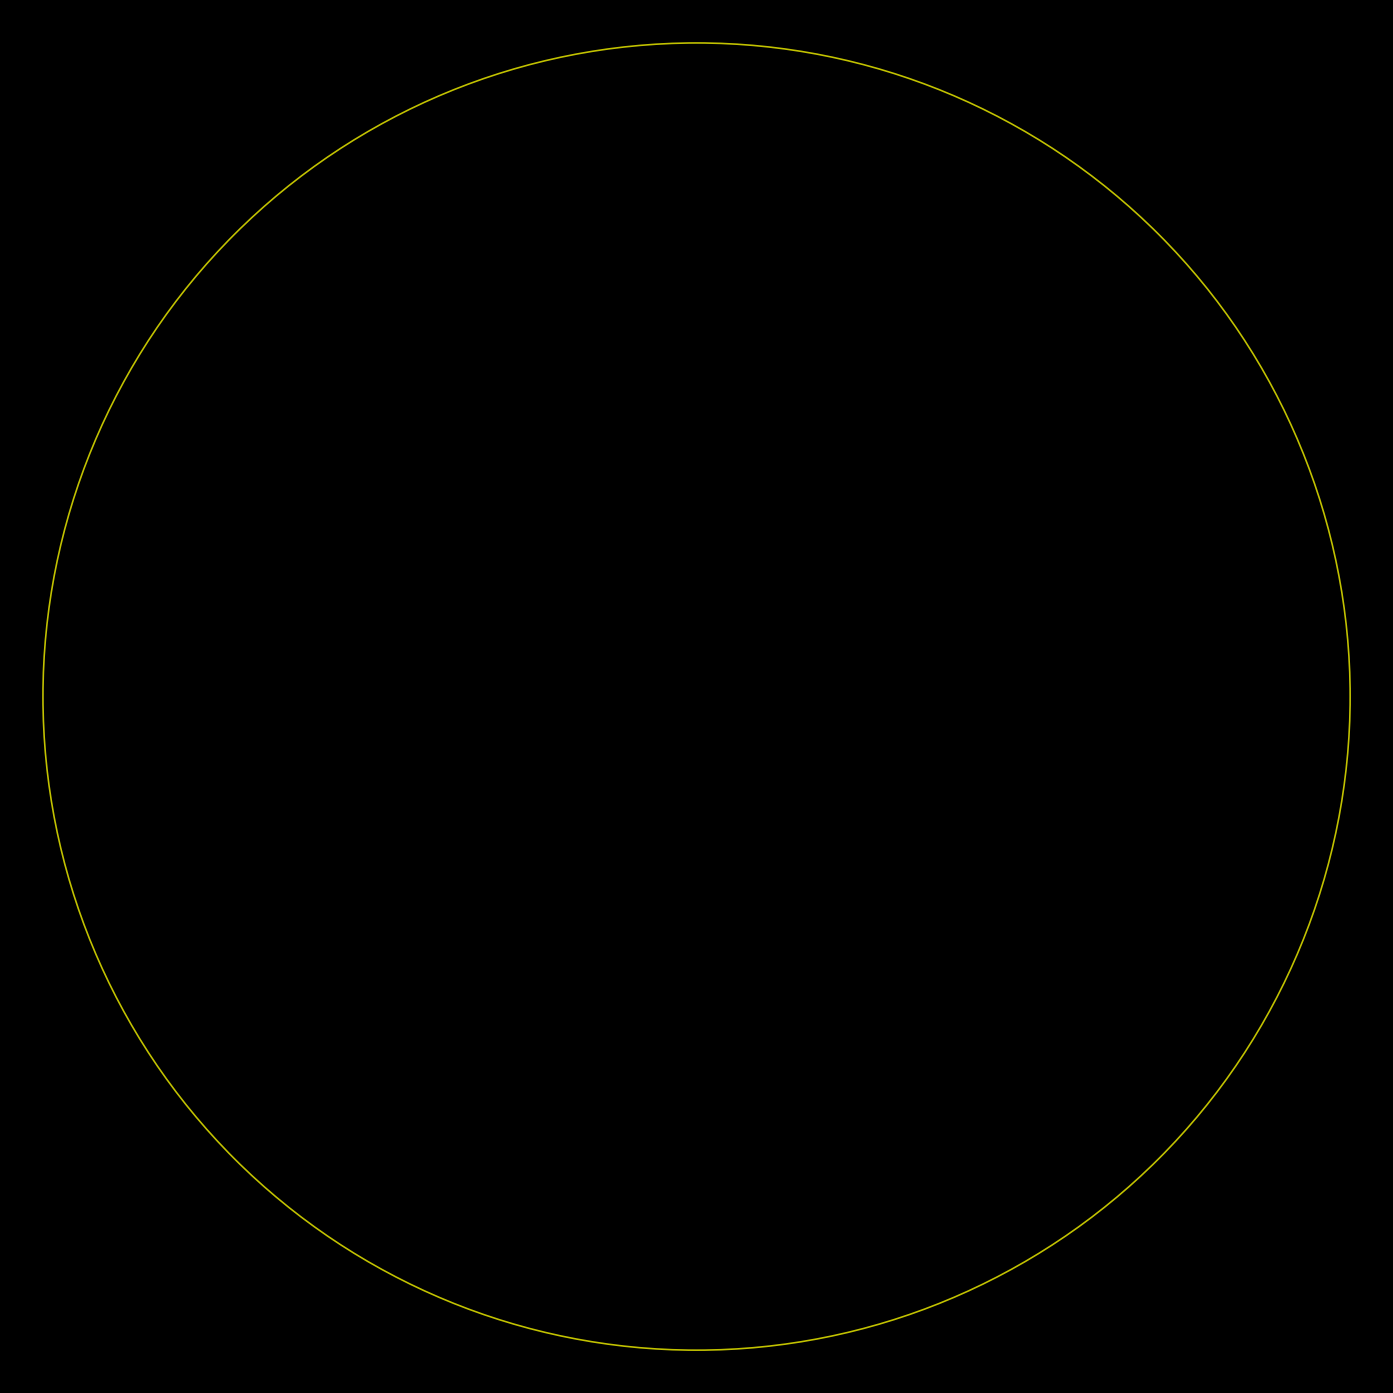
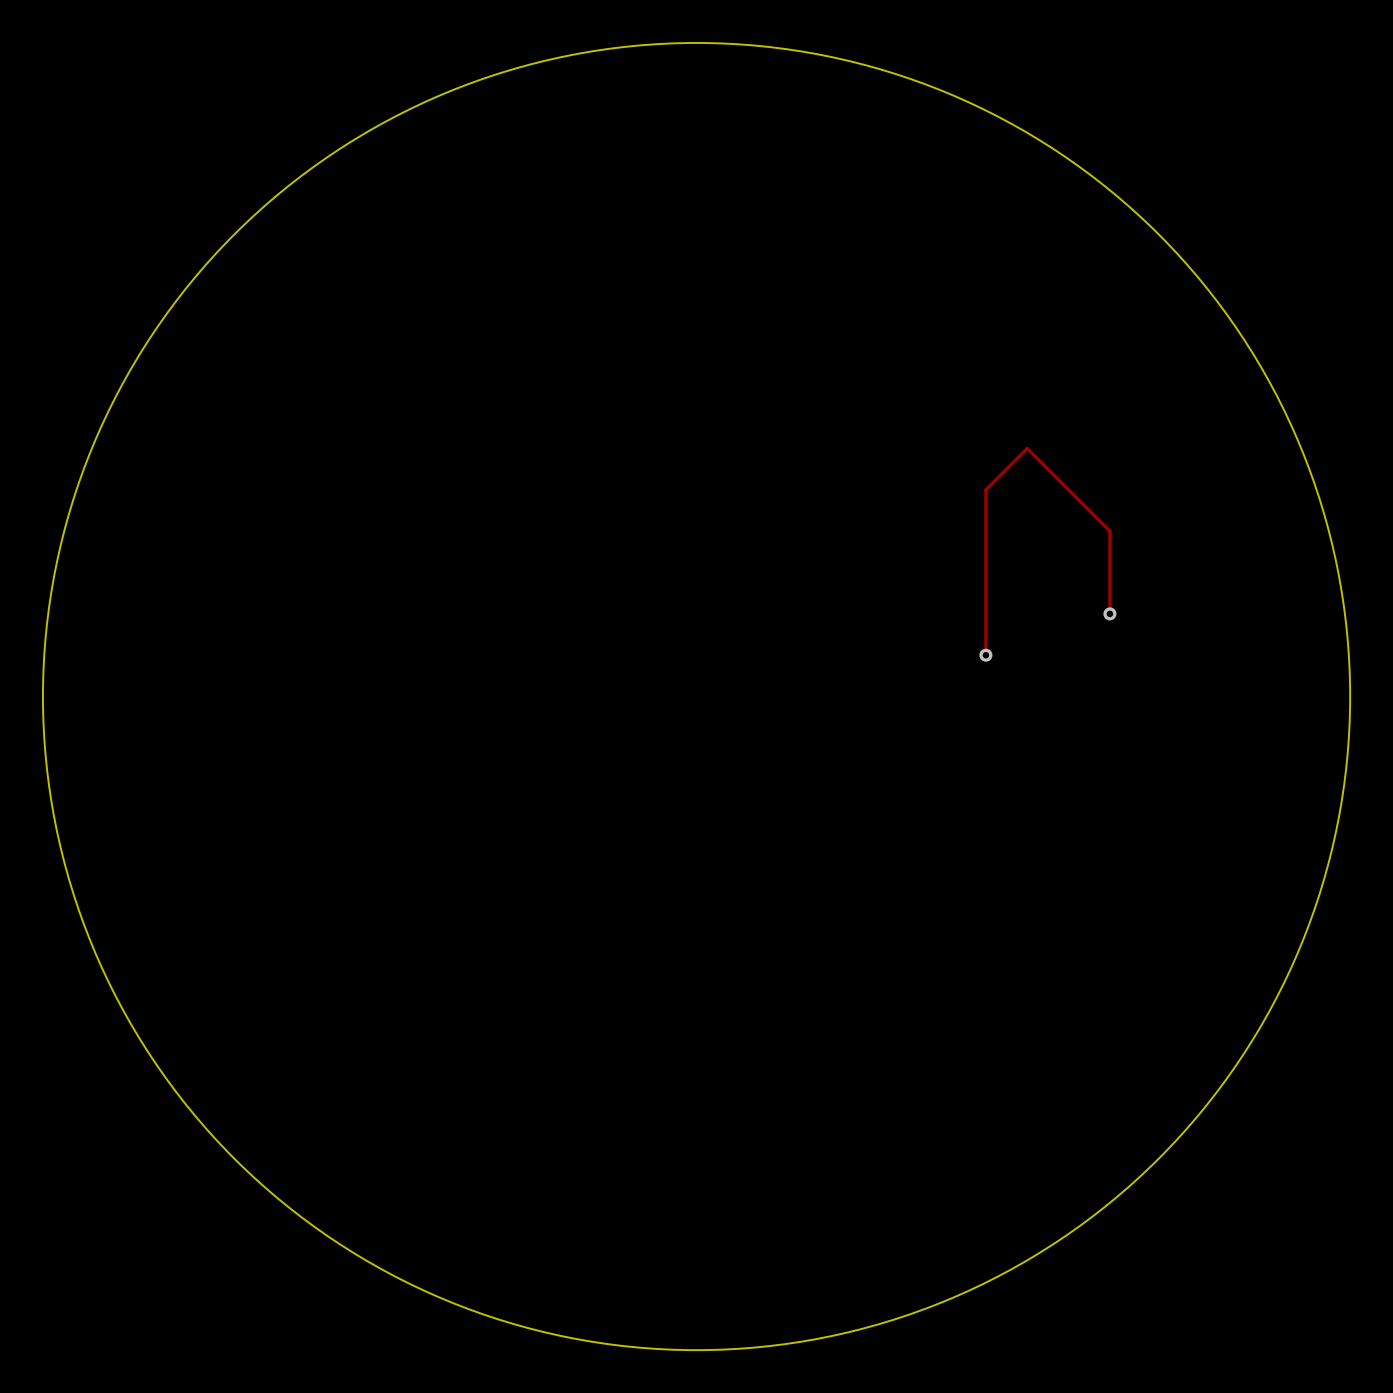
top track: none -> (1109, 613) (1109, 531) (1027, 448) (985, 489) (985, 655)
via: none -> (1109, 613)
via: none -> (985, 655)

